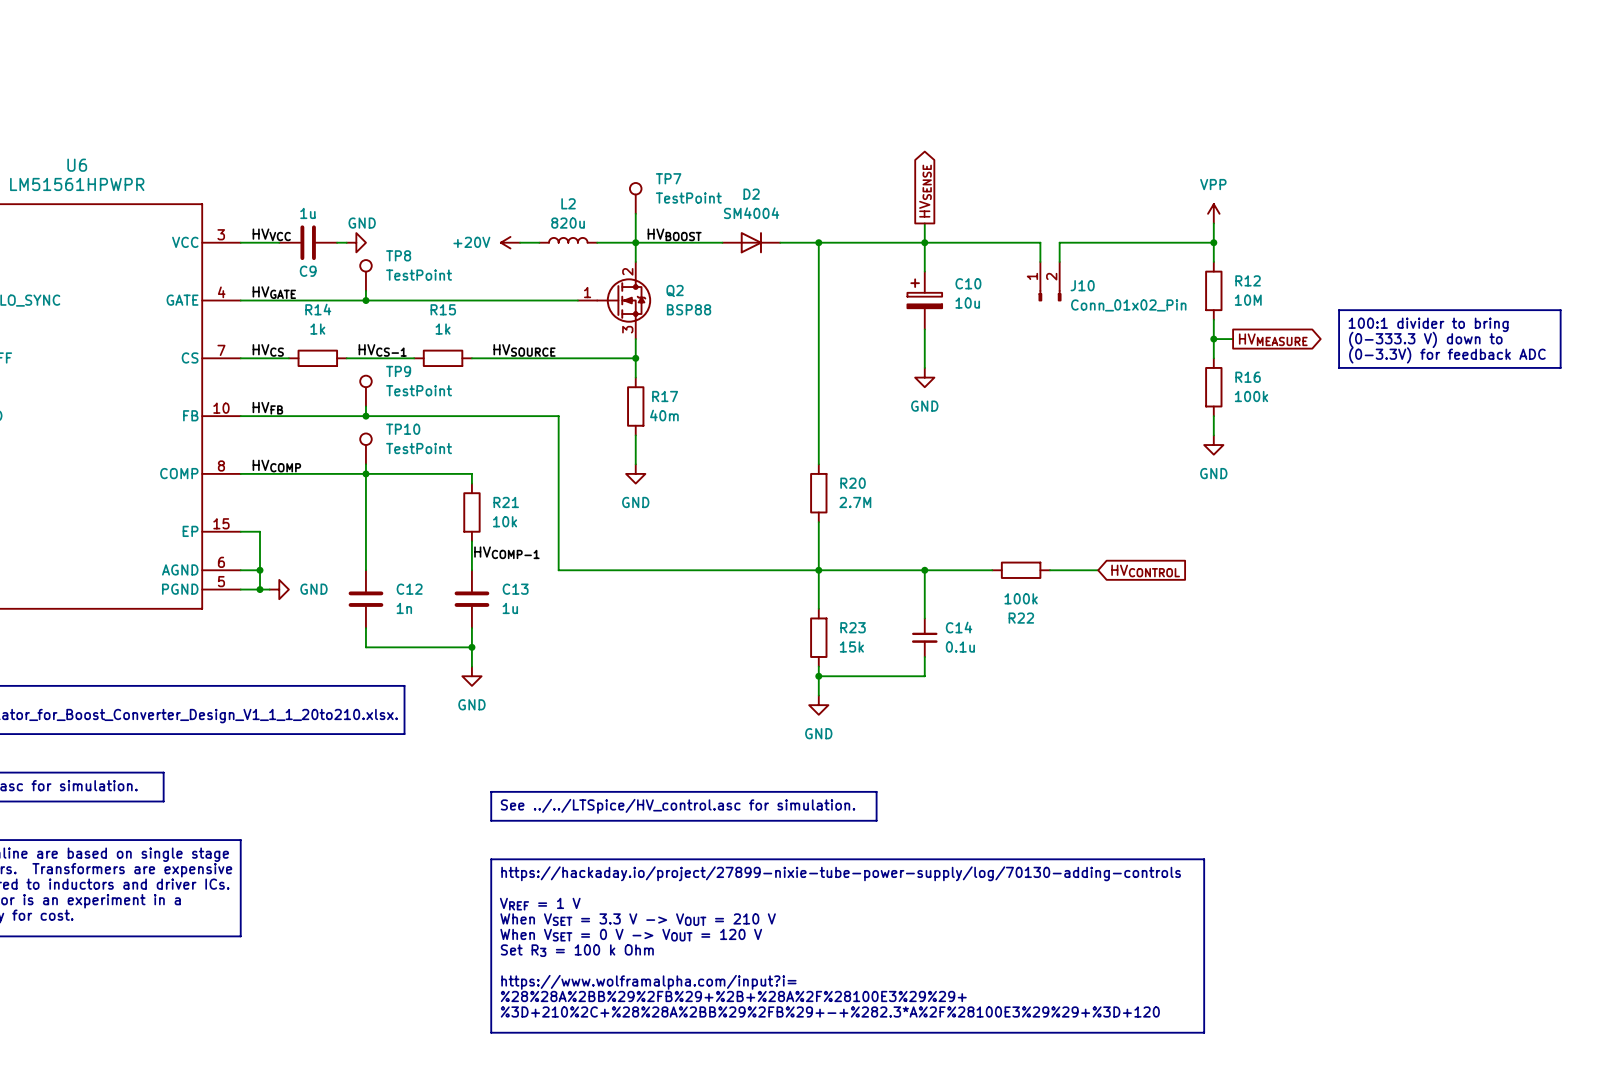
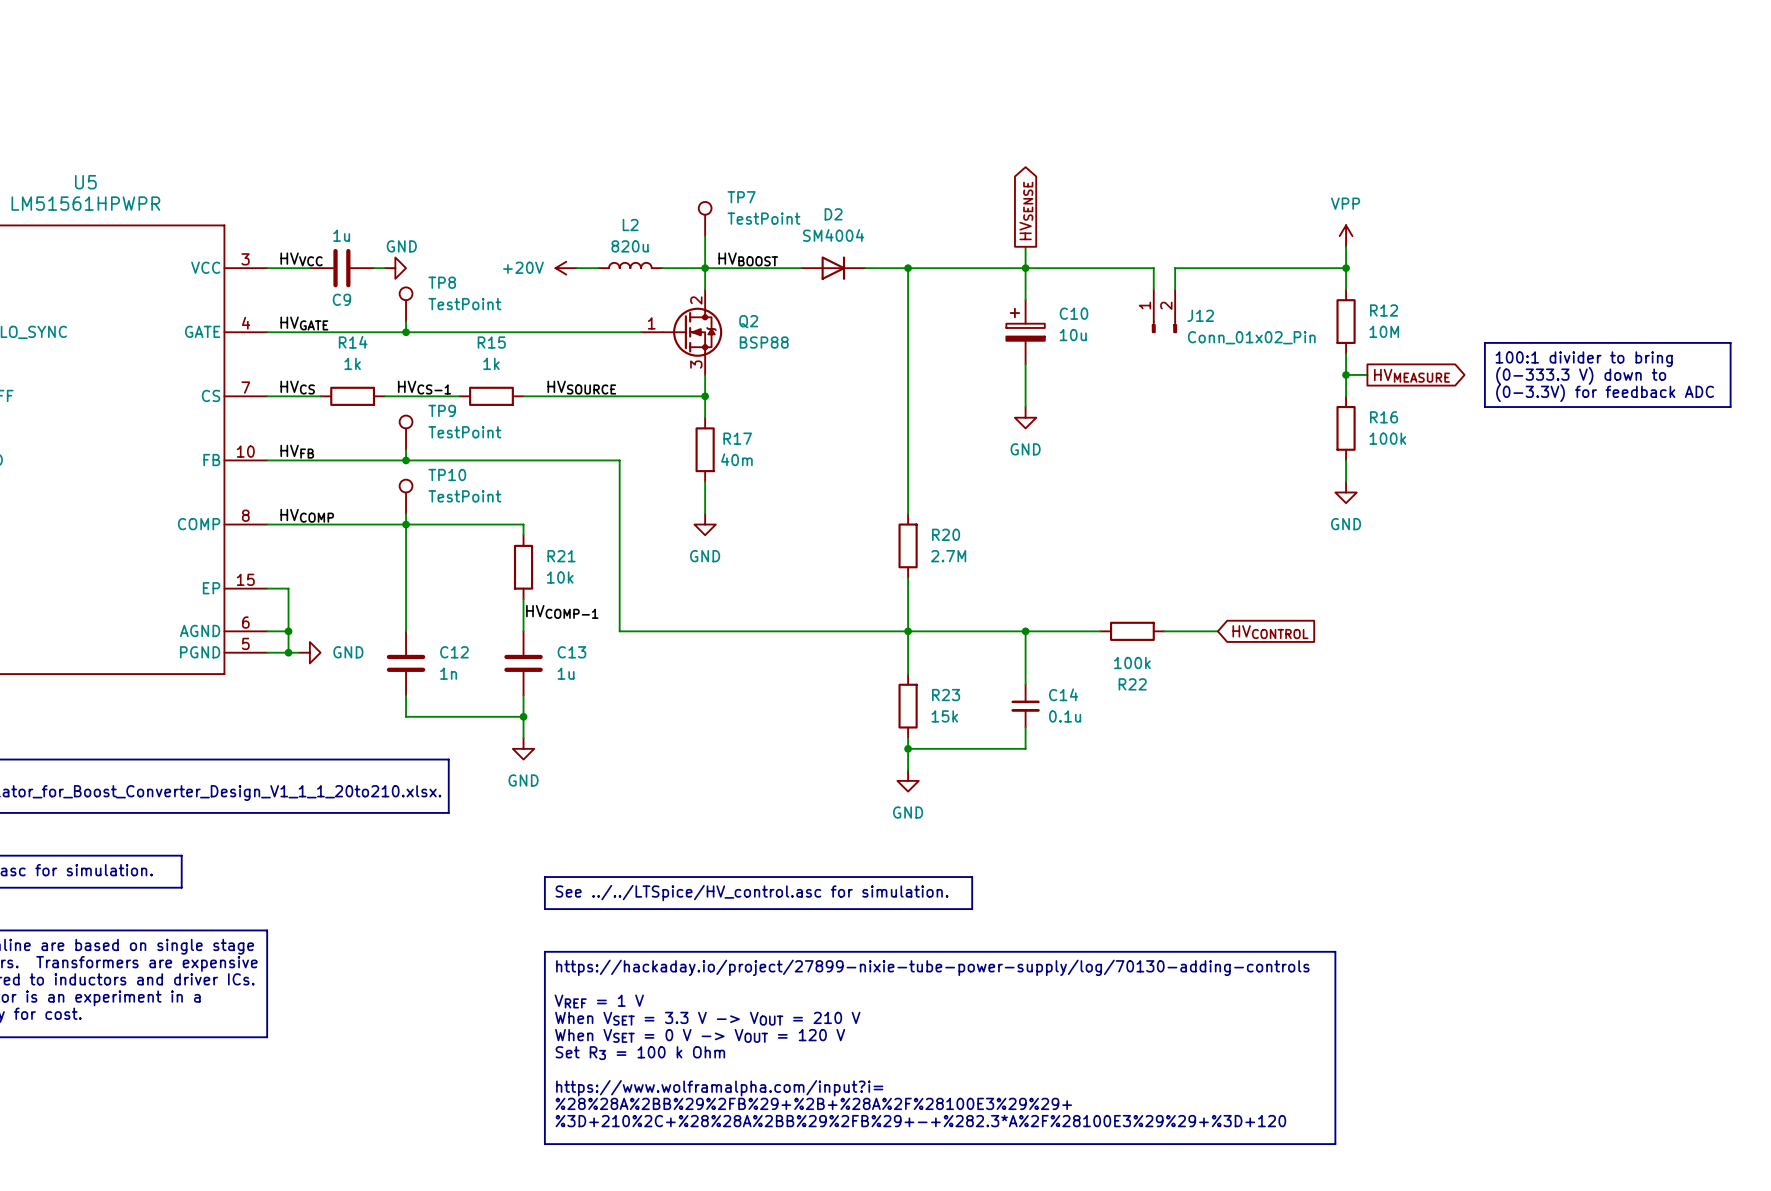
U6 name: U6 (77, 165) -> U5 (85, 182)
J10 name: J10 (1082, 285) -> J12 (1200, 315)

